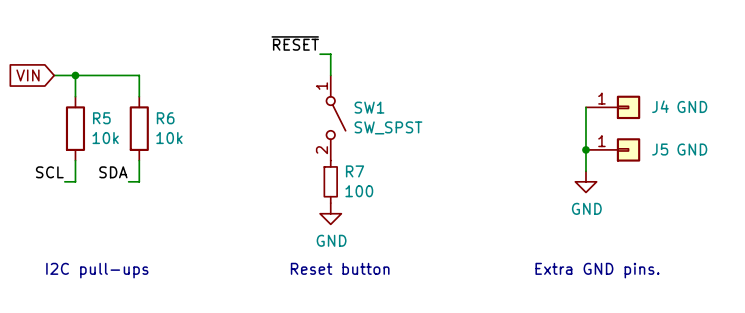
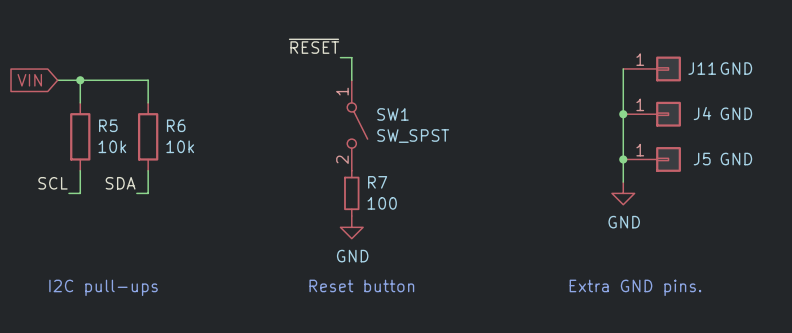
wire: none -> (623, 68) (623, 114)
J11: none -> GND (652, 68)
junction: none -> (623, 114)

